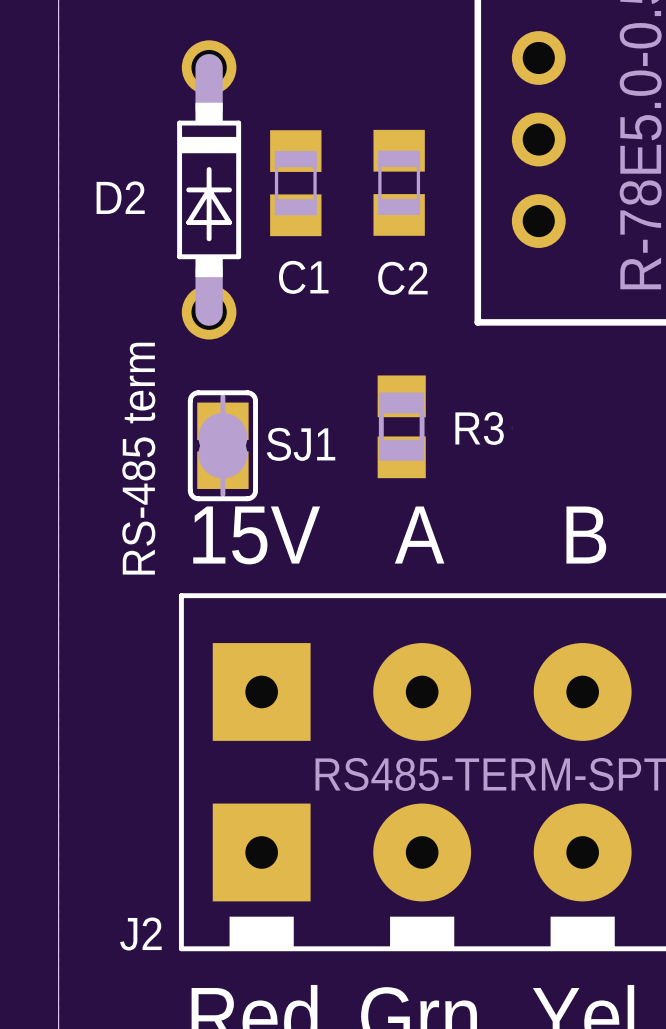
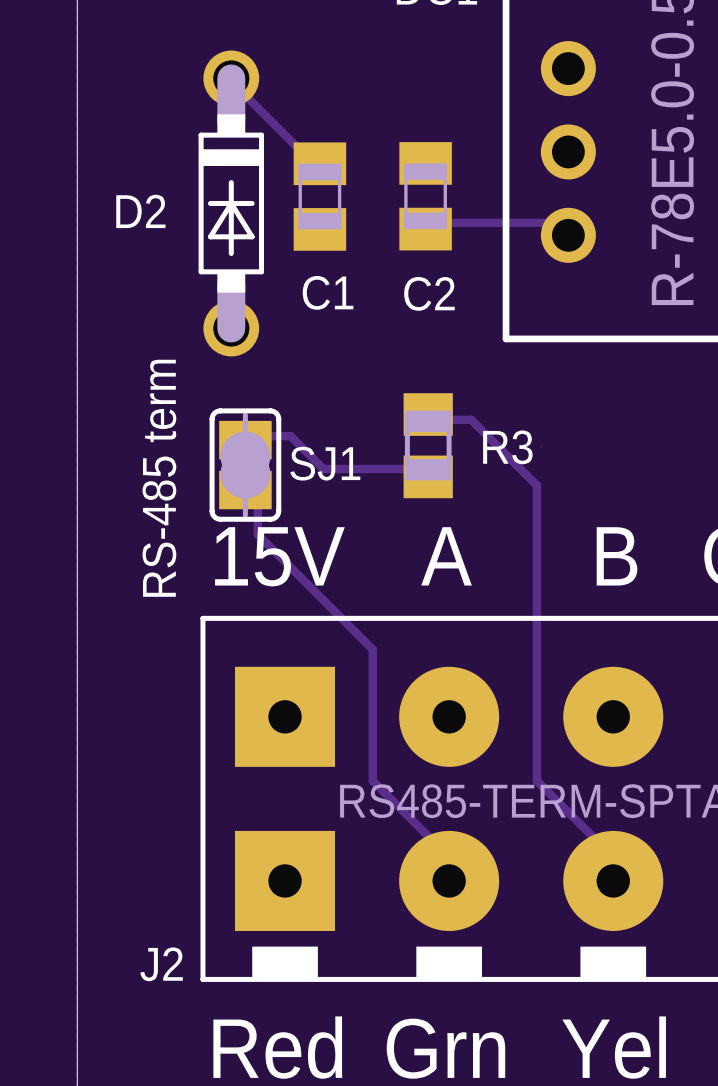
track: none -> (231, 78) (241, 91) (307, 157) (319, 163)
track: none -> (425, 229) (438, 222) (553, 222) (568, 235)
track: none -> (428, 414) (438, 419) (471, 419) (536, 485) (536, 780) (602, 846) (602, 879) (613, 880)
track: none -> (245, 440) (257, 436) (290, 436) (323, 469) (422, 469) (428, 476)
track: none -> (245, 490) (257, 501) (257, 534) (372, 649) (372, 780) (438, 846) (438, 879) (449, 880)

